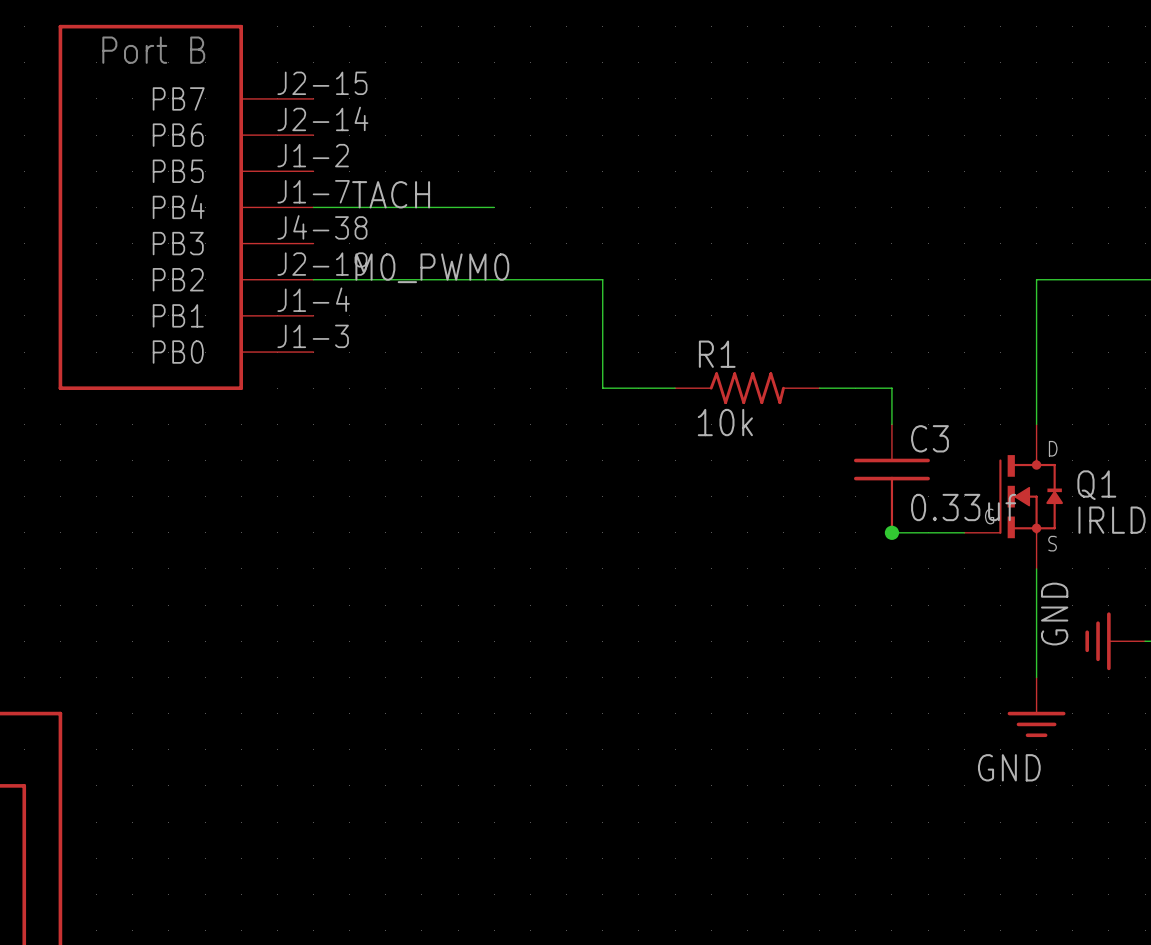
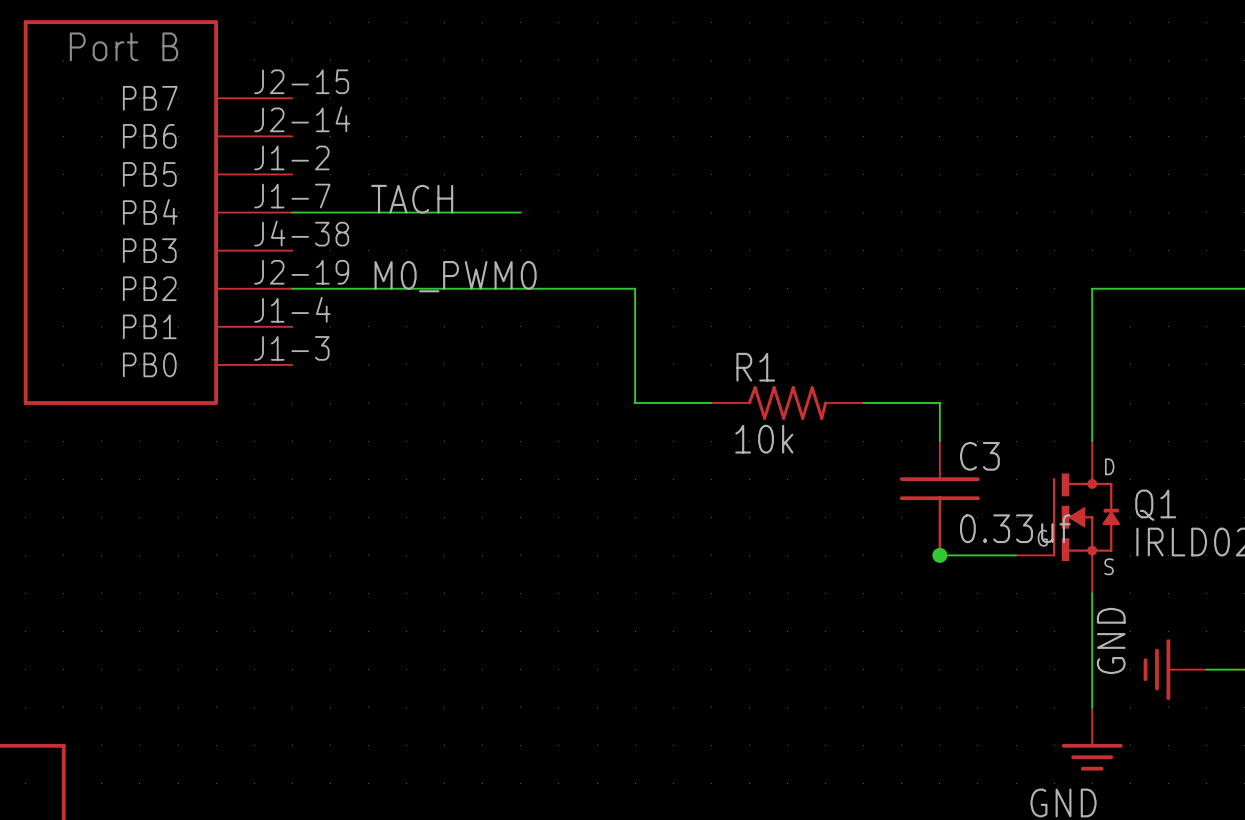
part position: (186, 207) -> (158, 212)

